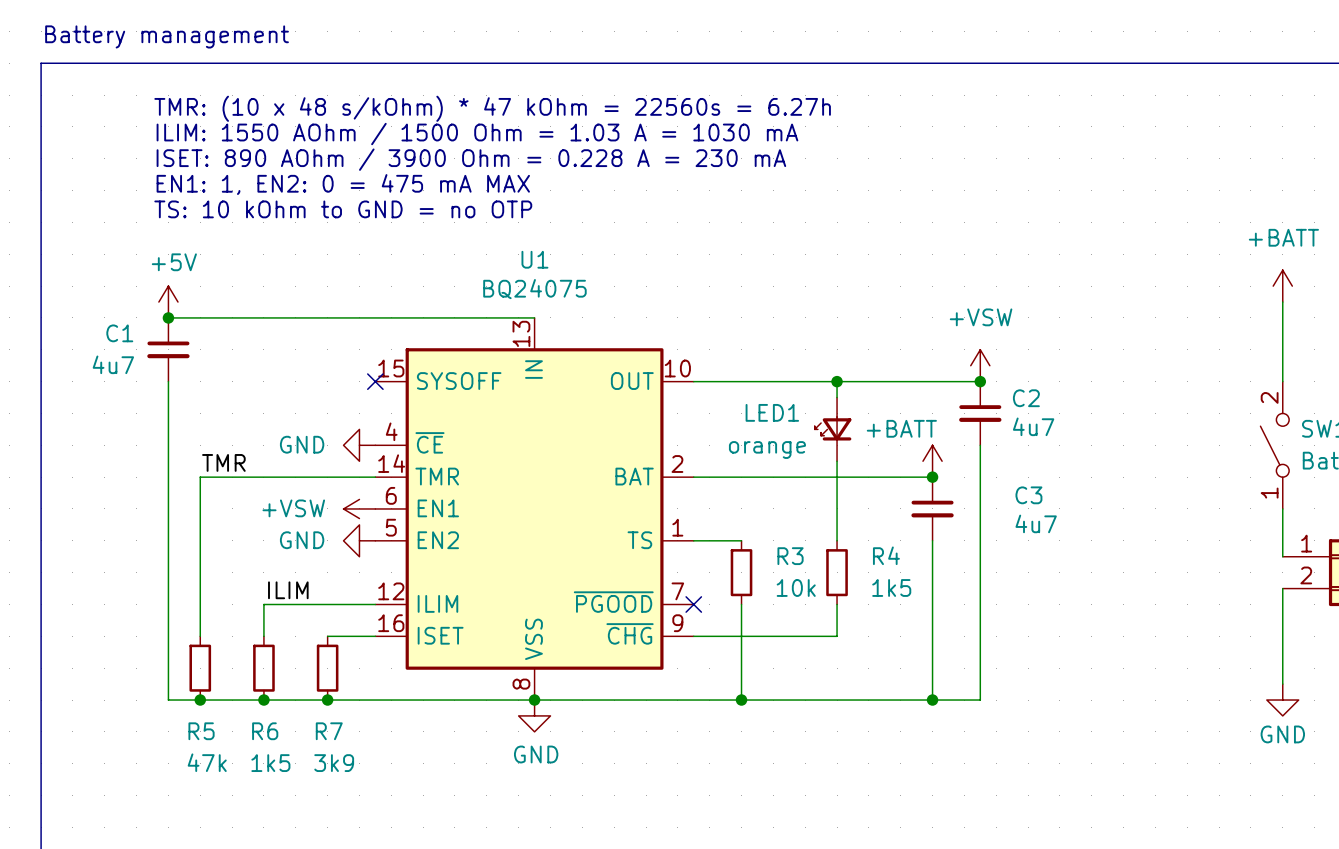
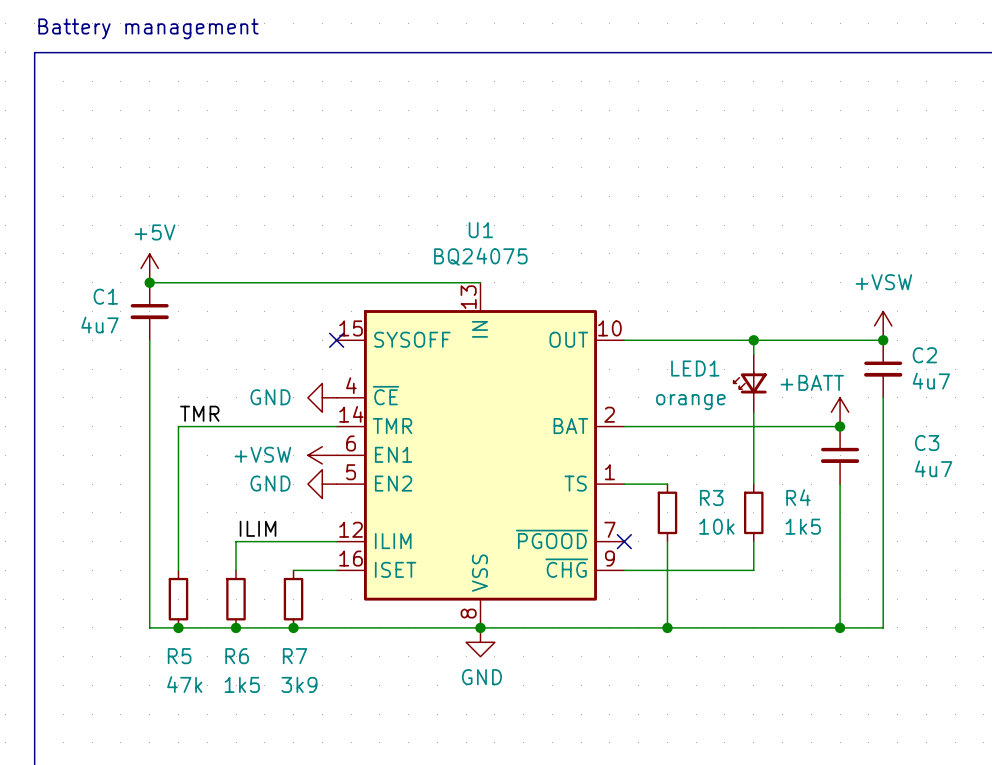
text: TMR: (10 x 48 s/kOhm) * 47 kOhm = 22560s = 6.27h (492, 108) -> none
text: ILIM: 1550 AOhm / 1500 Ohm = 1.03 A = 1030 mA (477, 134) -> none
text: ISET: 890 AOhm / 3900 Ohm = 0.228 A = 230 mA (471, 159) -> none
text: EN1: 1, EN2: 0 = 475 mA MAX (343, 184) -> none
text: TS: 10 kOhm to GND = no OTP (343, 209) -> none

